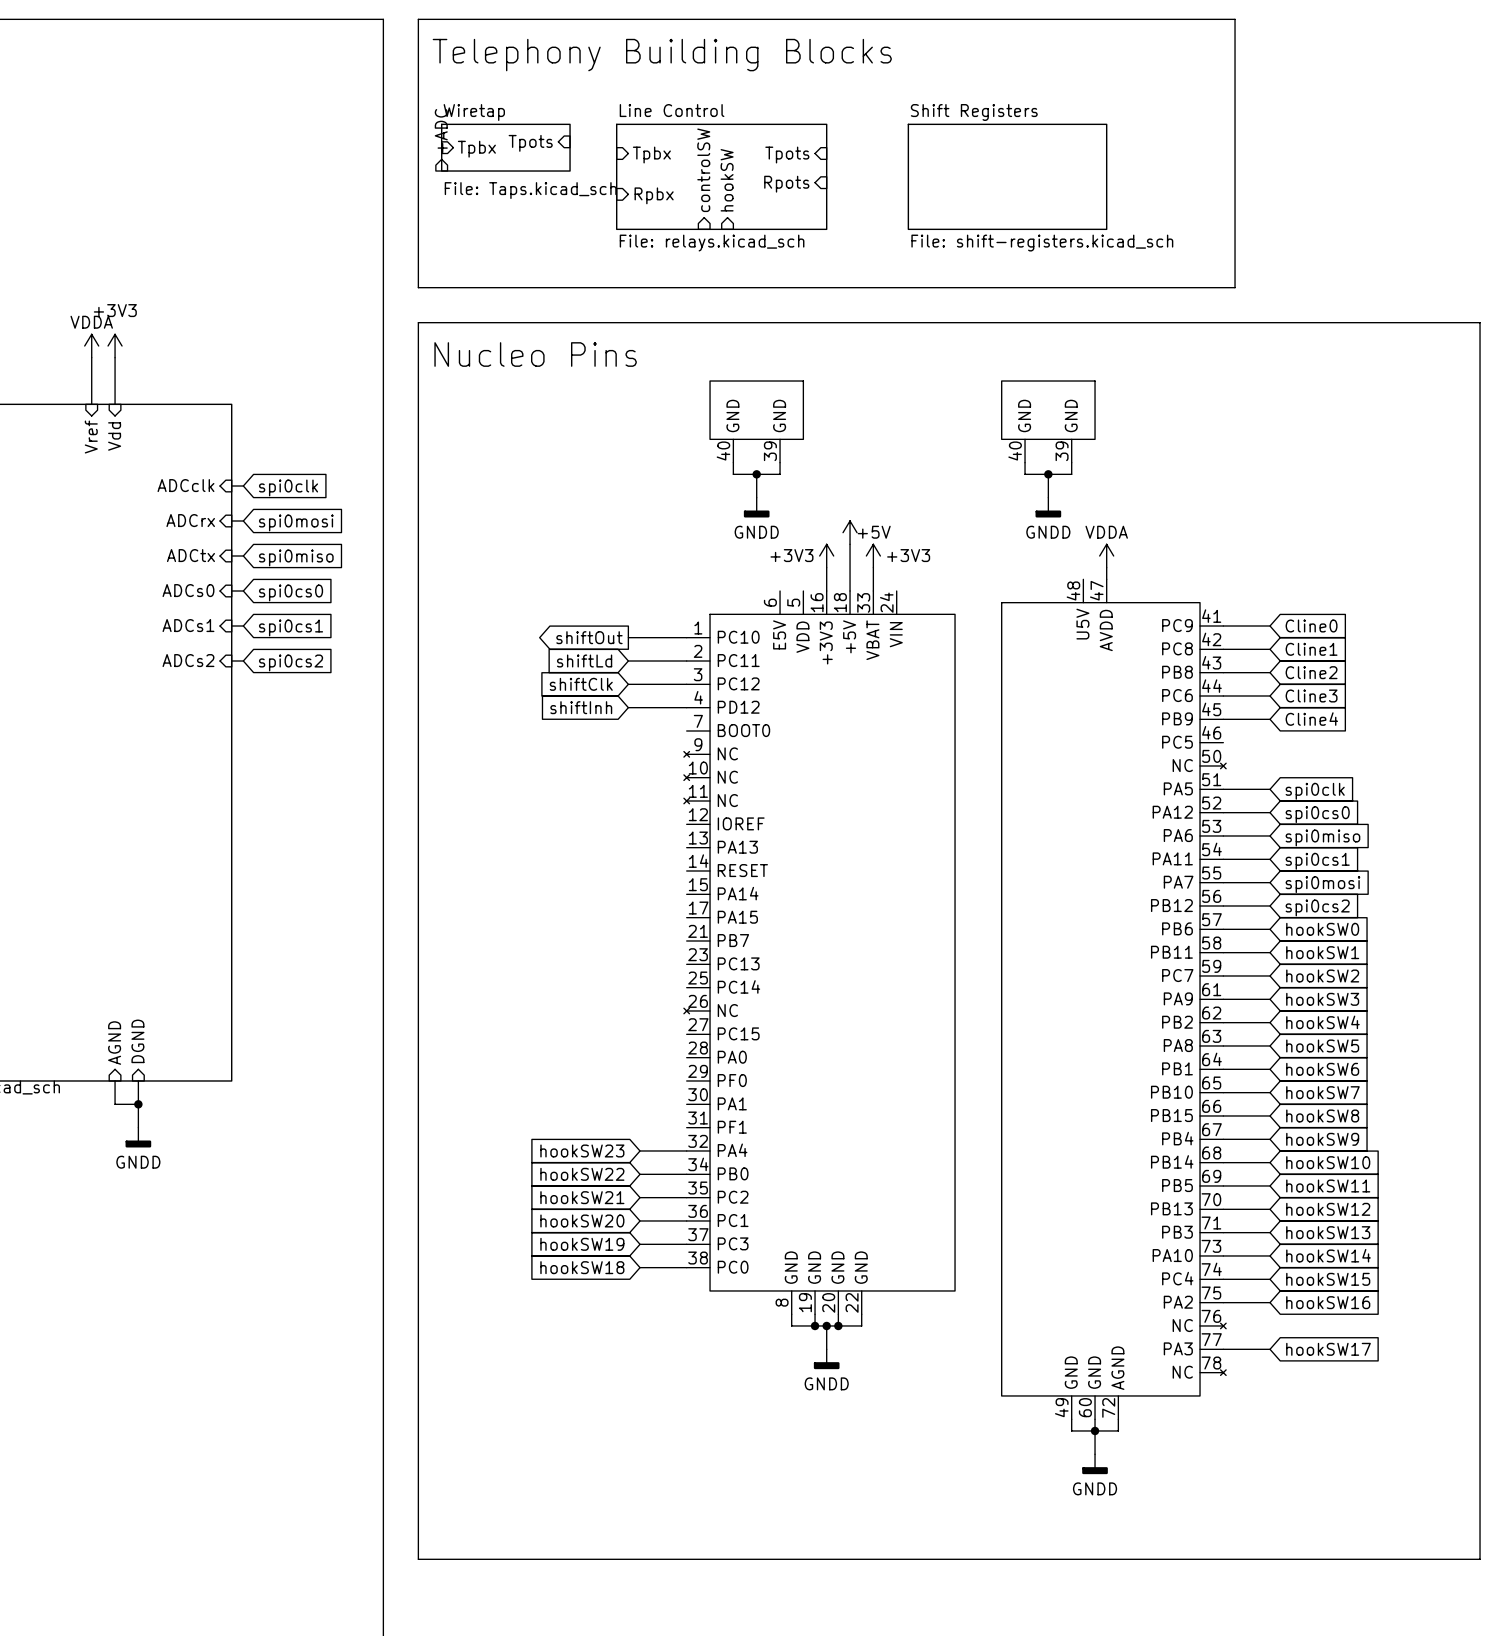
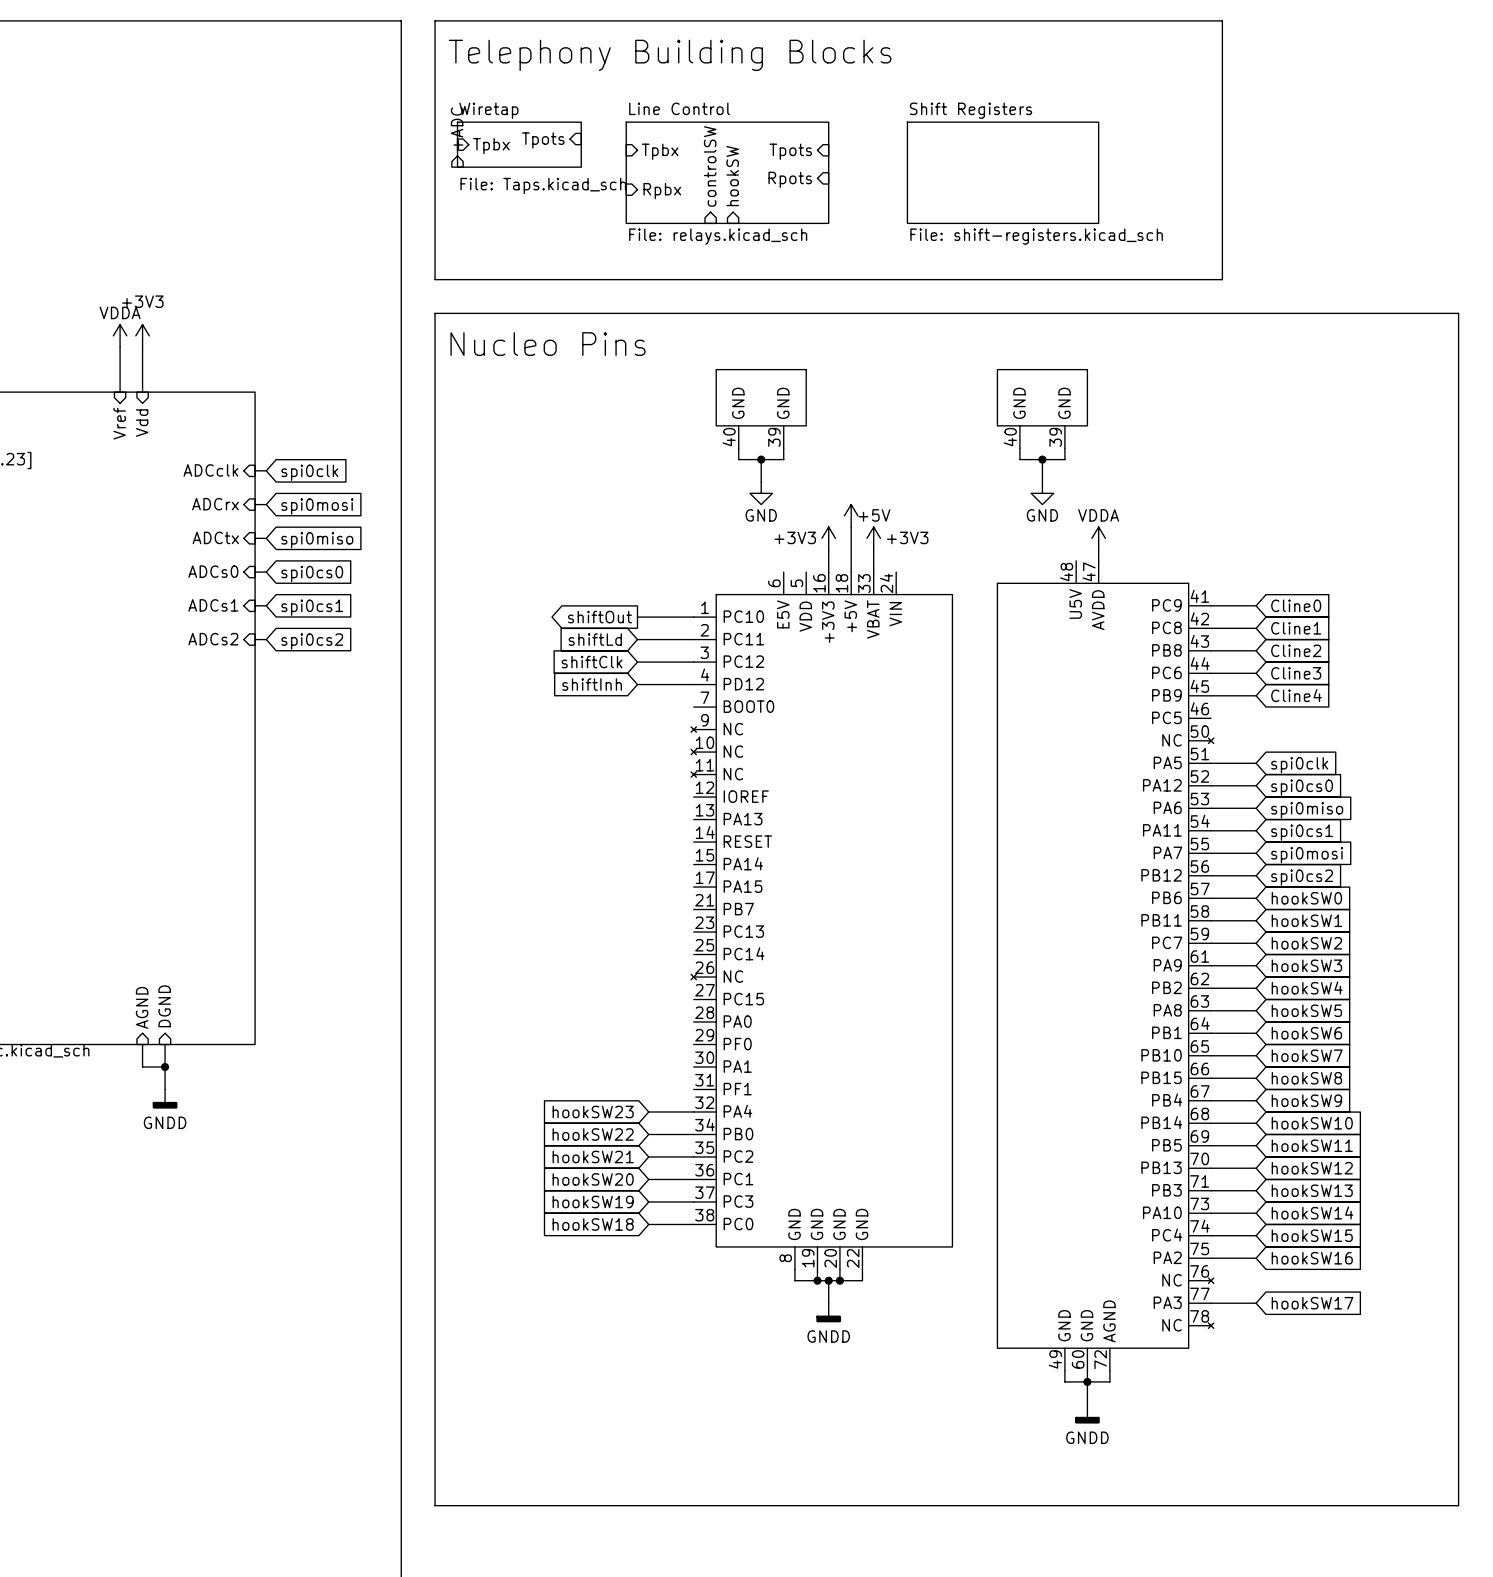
power symbol: GNDD (756, 507) -> GND (761, 493)
power symbol: GNDD (1048, 507) -> GND (1042, 493)

